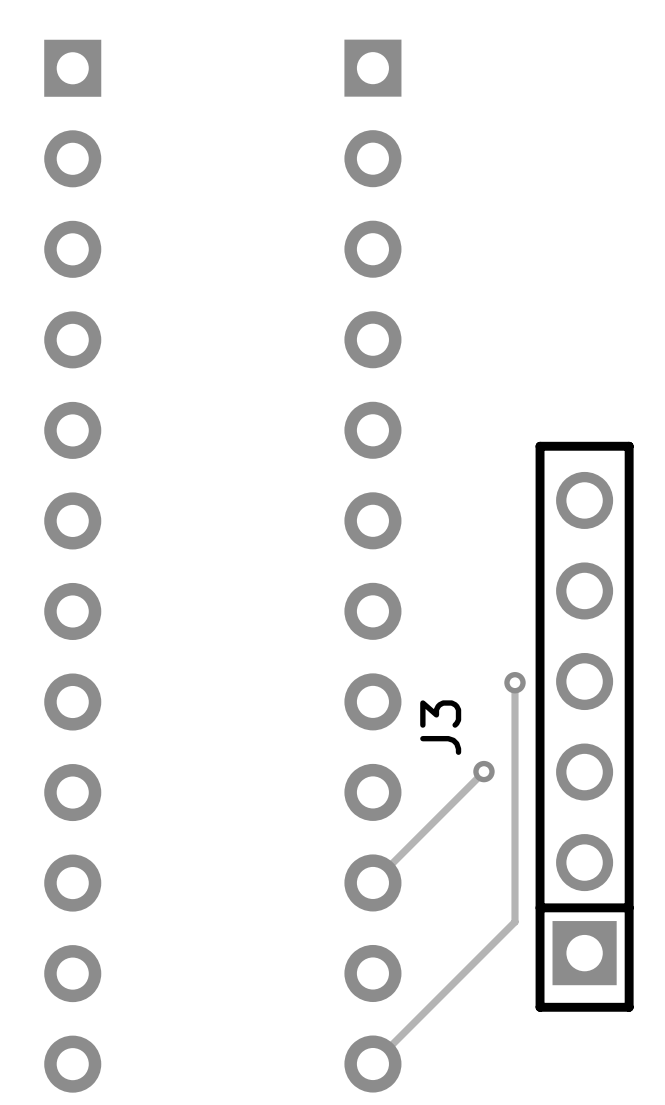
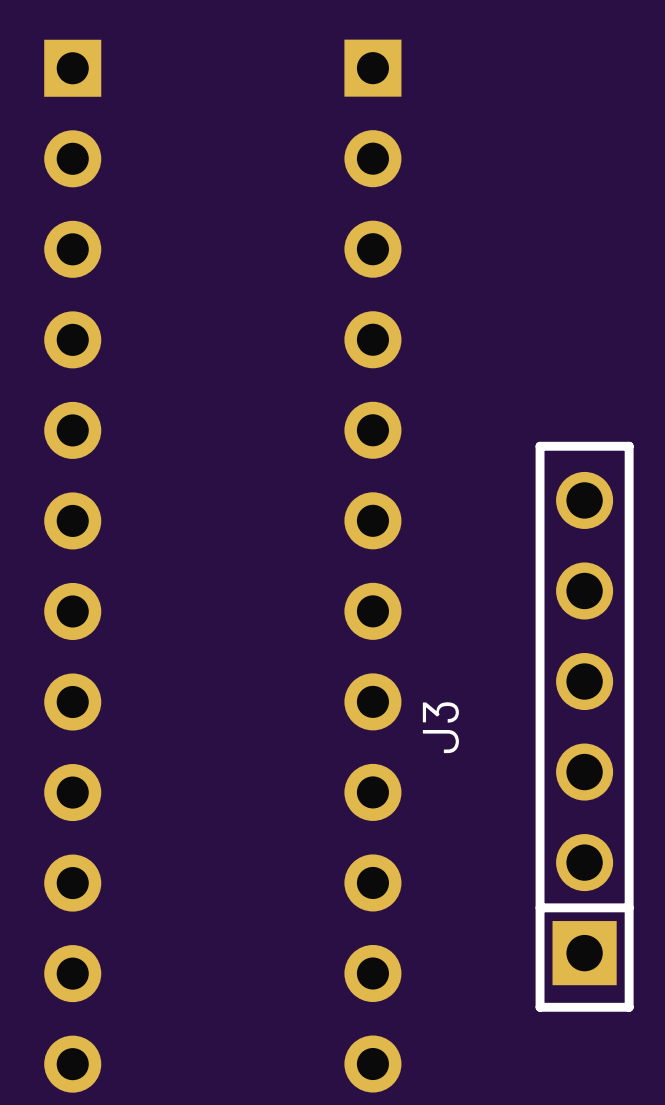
track: (514, 682) (514, 921) (372, 1064) -> none
via: (514, 682) -> none
track: (483, 771) (372, 882) -> none
via: (483, 771) -> none

